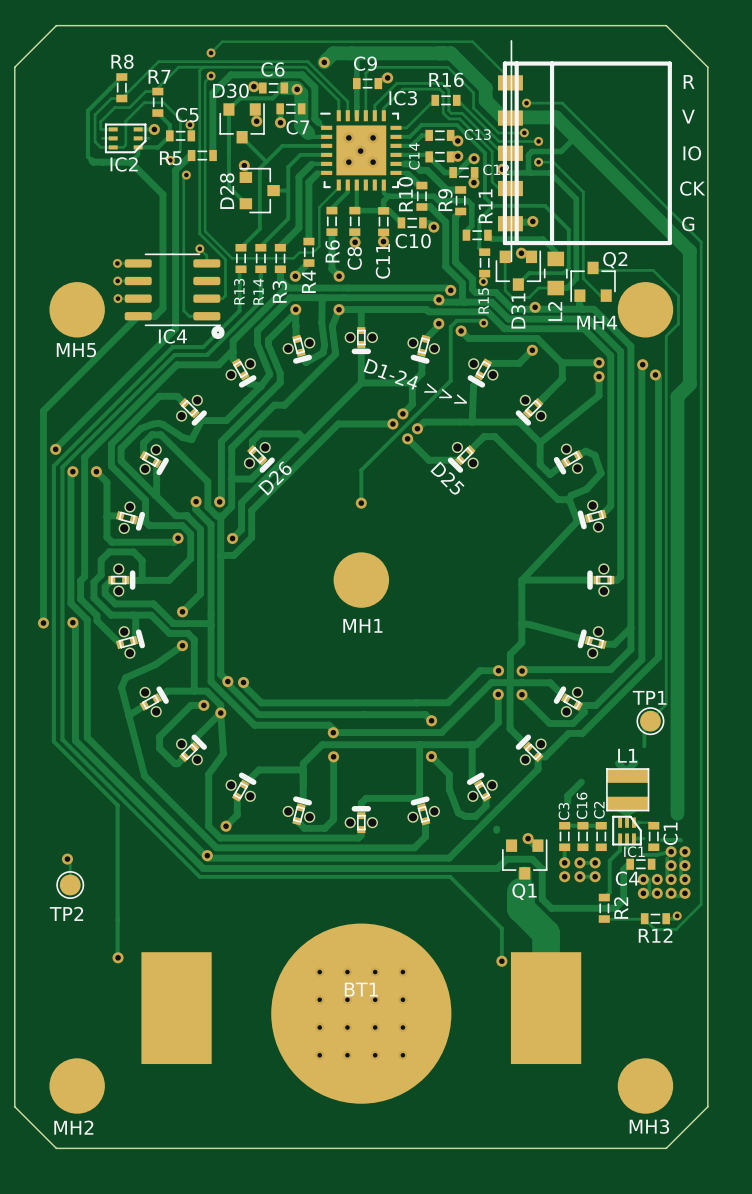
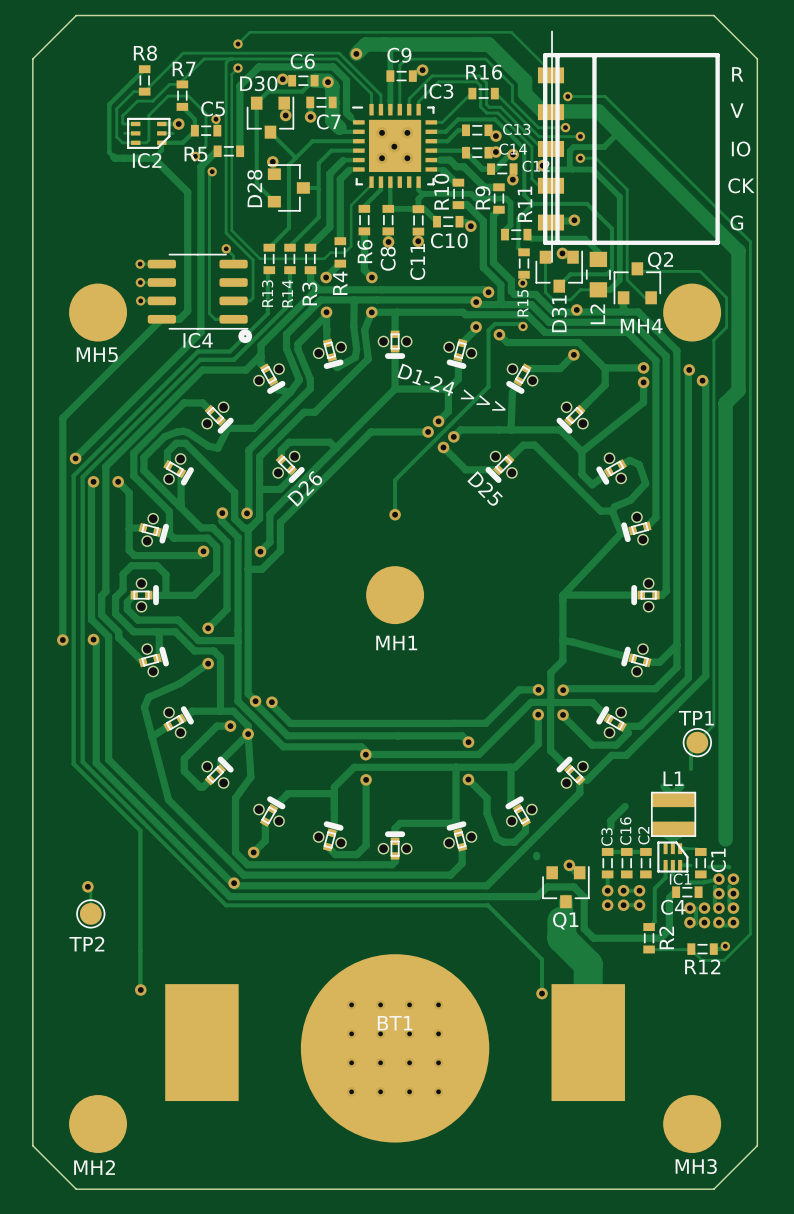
C14 name rotation: 0° (414, 156) -> 90° clockwise (513, 149)
C14 name position: C14 (414, 156) -> C14 (513, 149)

